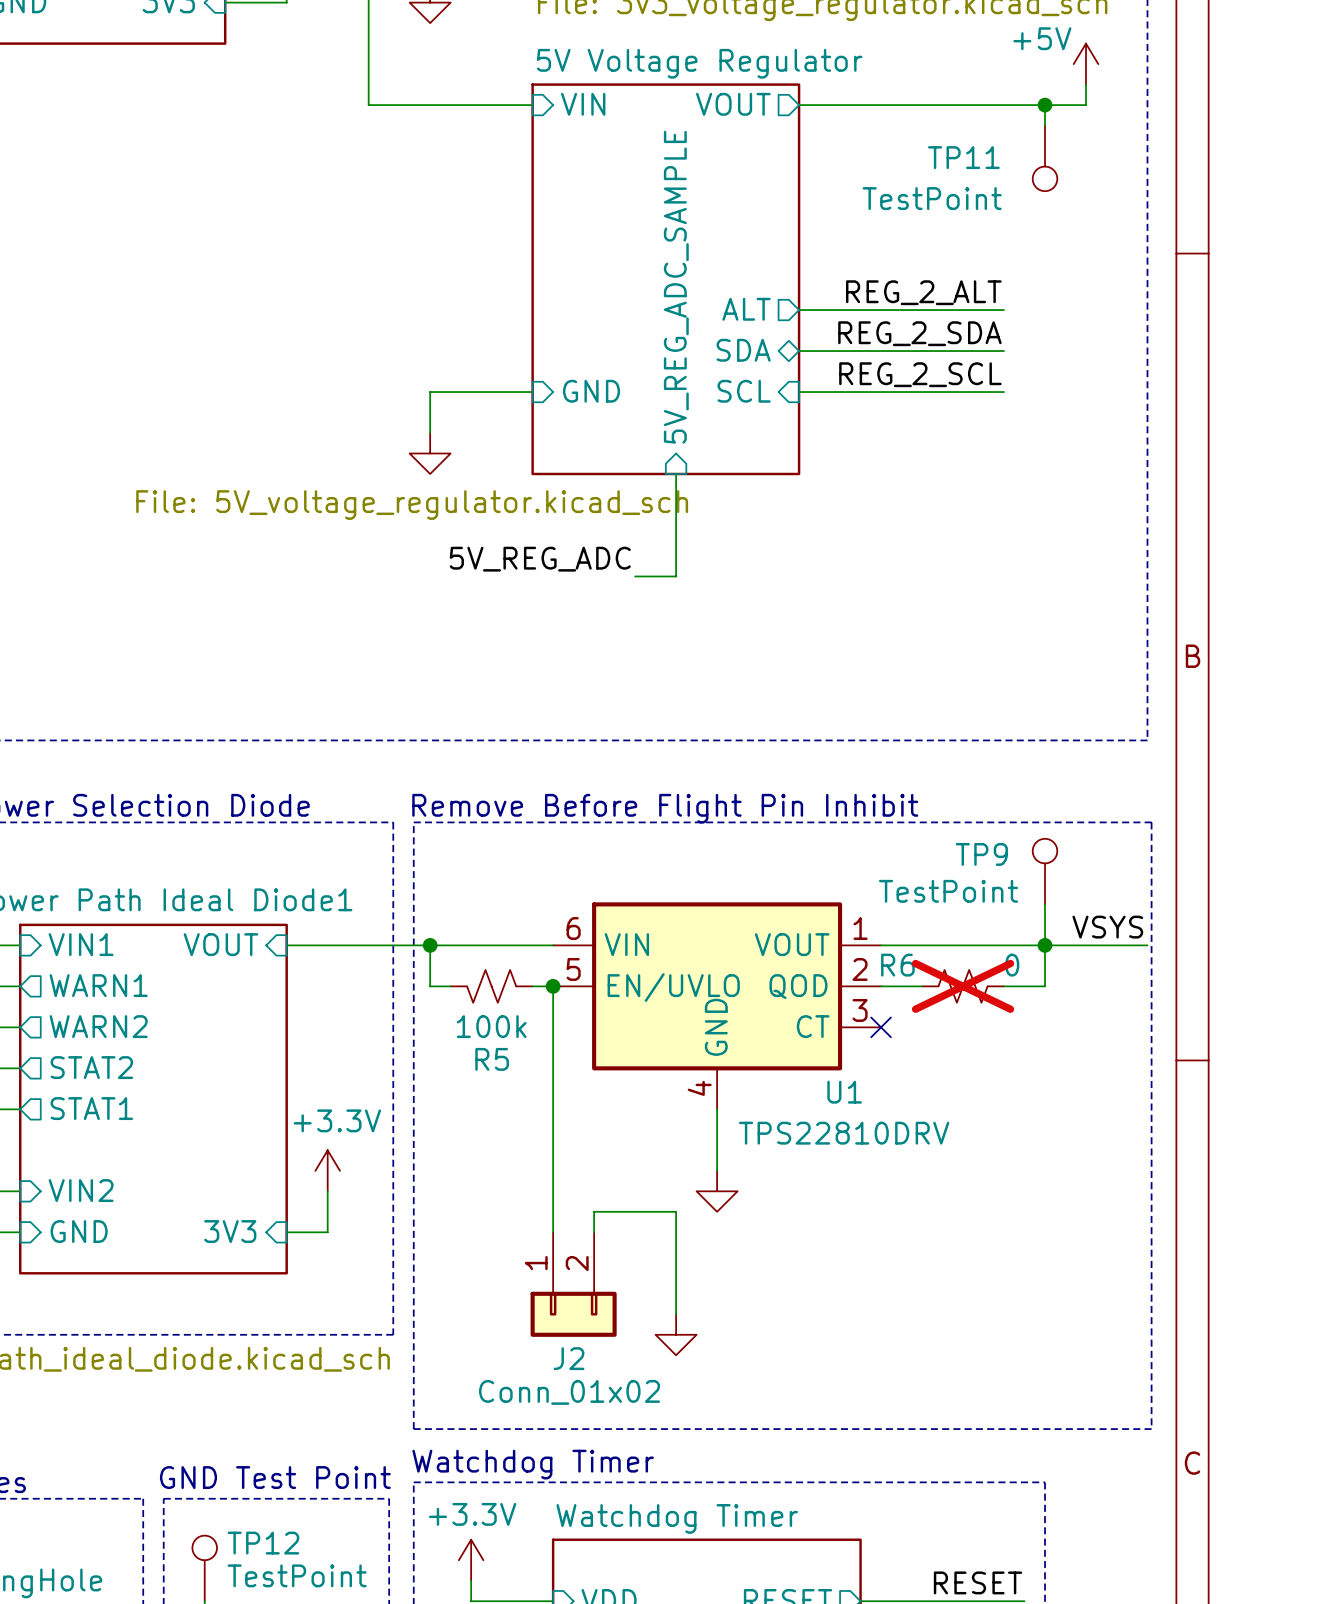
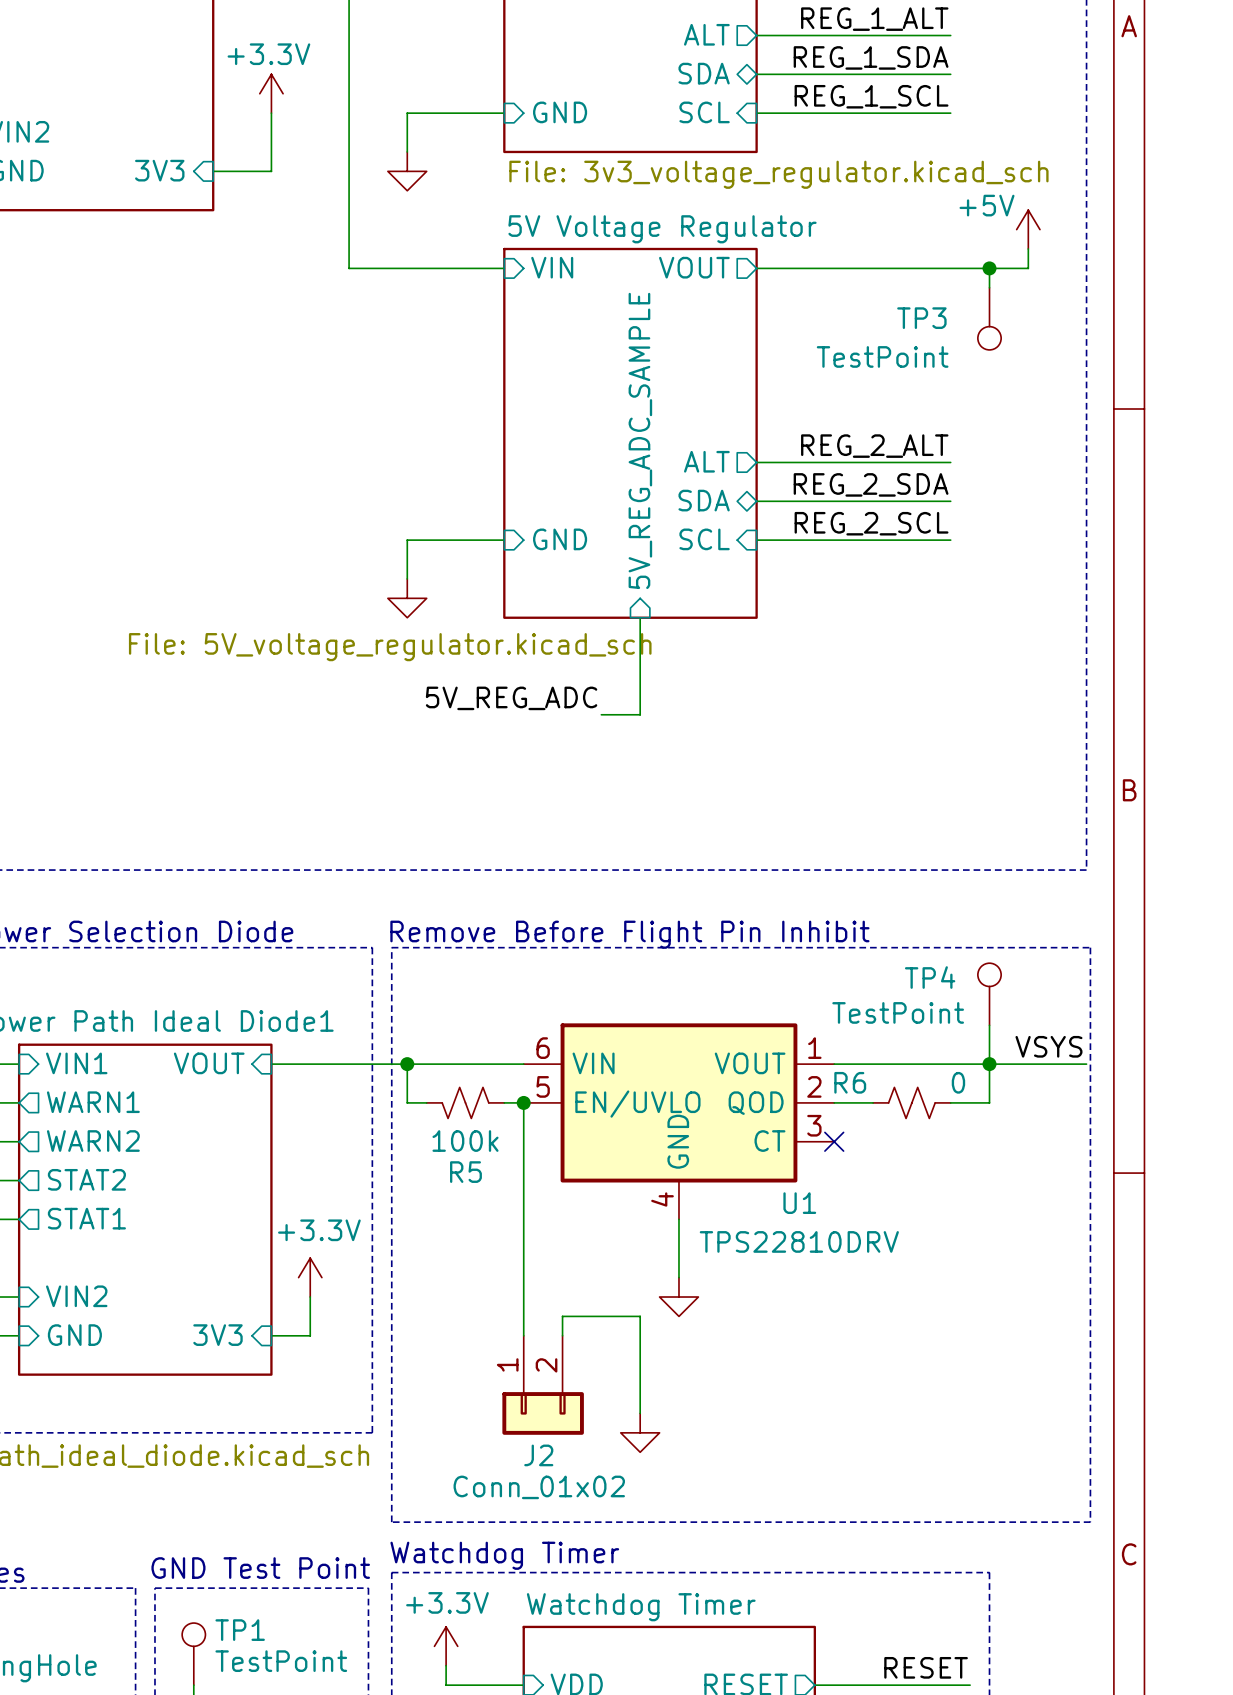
TP11 name: TP11 (963, 157) -> TP3 (921, 318)
TP9 name: TP9 (981, 854) -> TP4 (930, 977)
R6 do-not-place cross: (963, 986) -> none
TP12 name: TP12 (263, 1543) -> TP1 (240, 1630)

